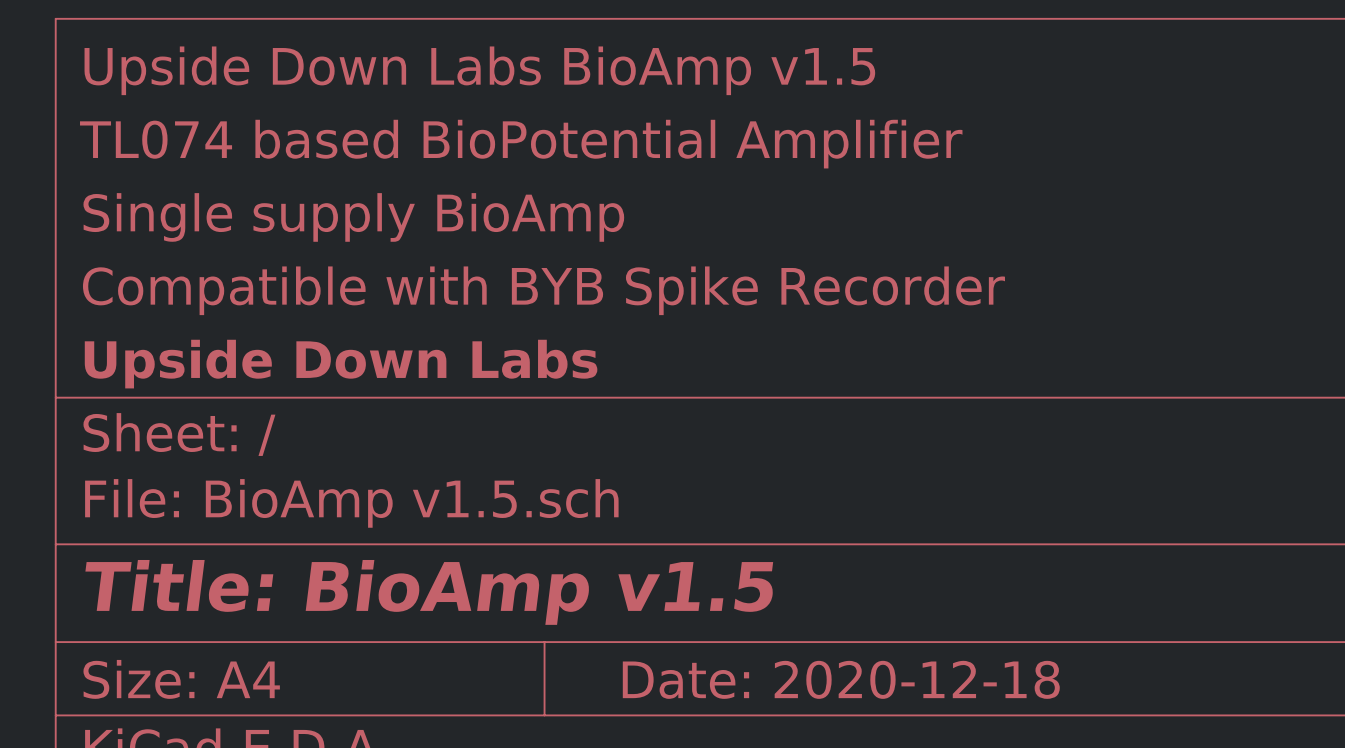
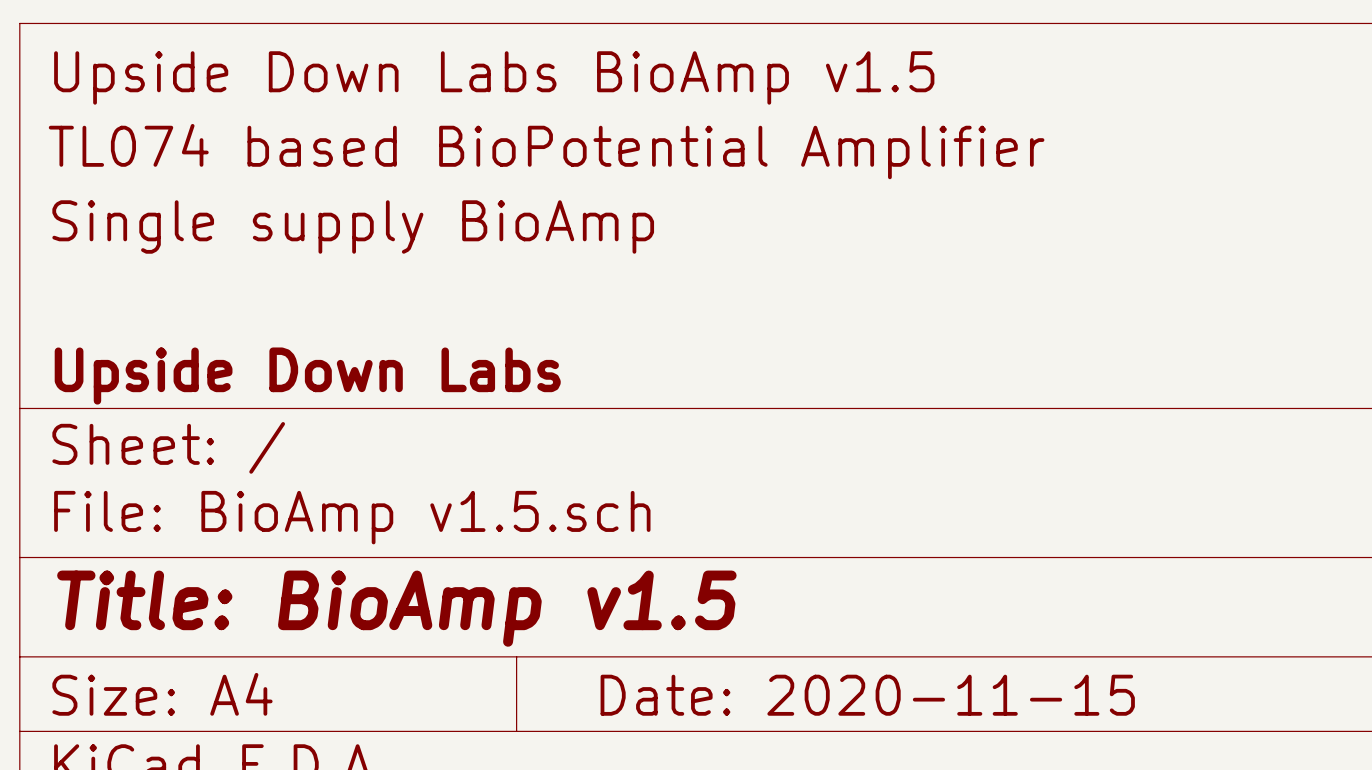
title block: Compatible with BYB Spike Recorder (543, 290) -> none
title block: Date: 2020-12-18 (841, 679) -> Date: 2020-11-15 (867, 695)

